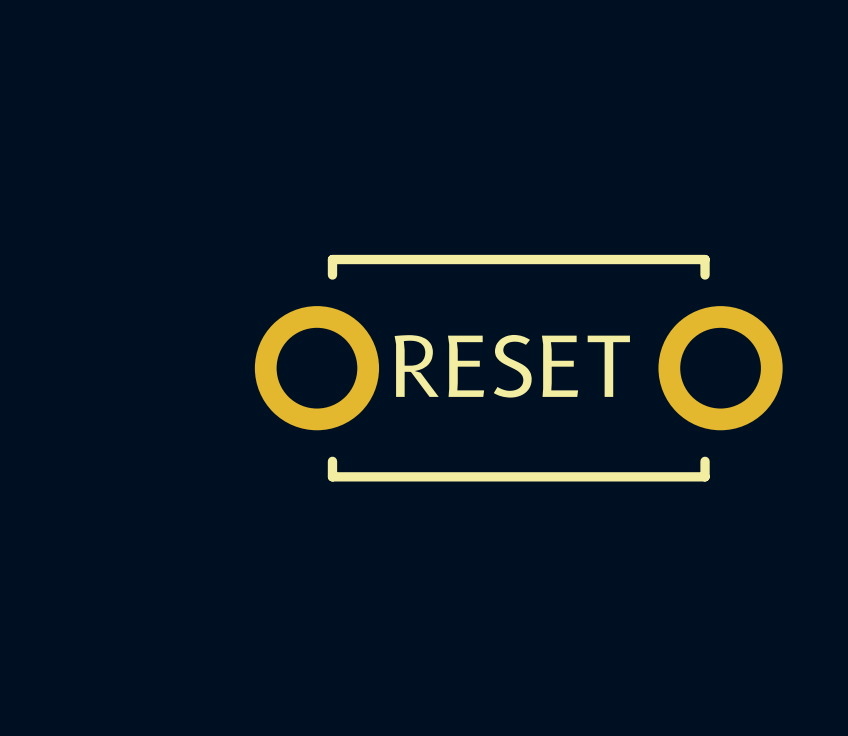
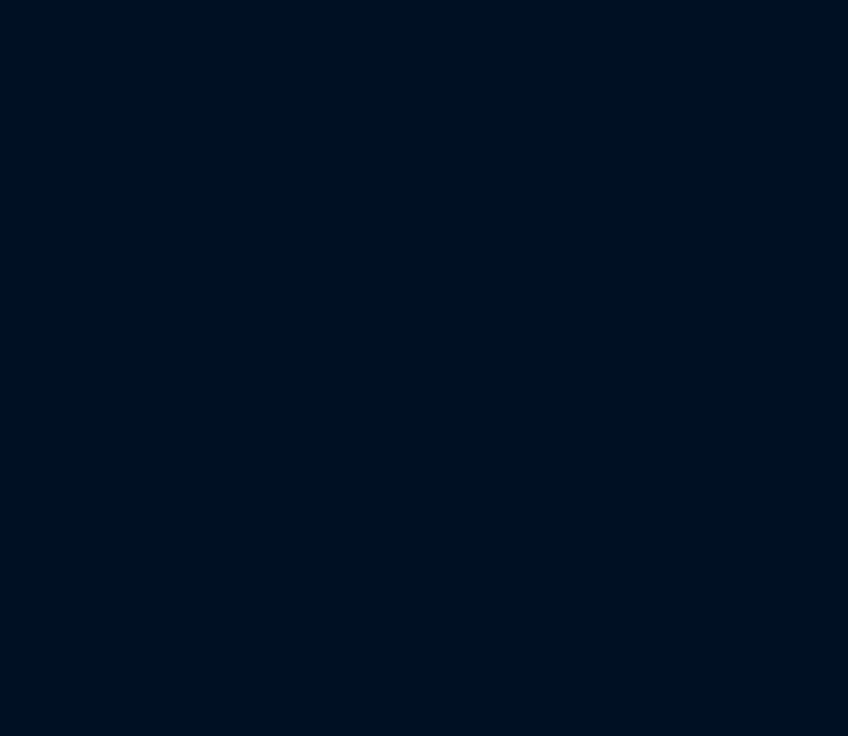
part: (518, 368) -> none

